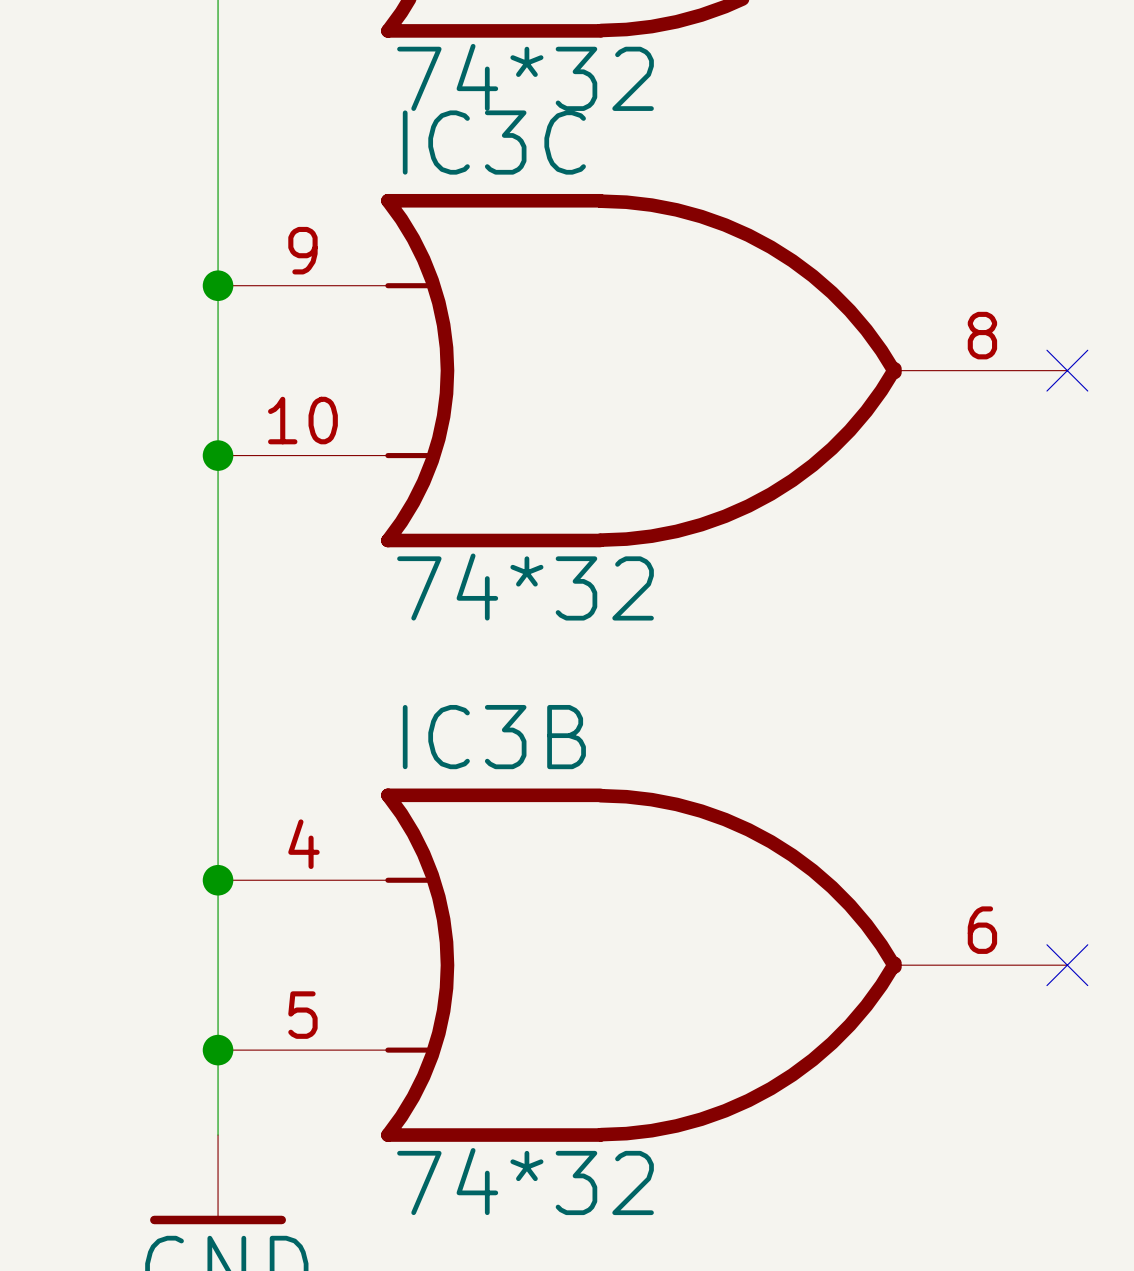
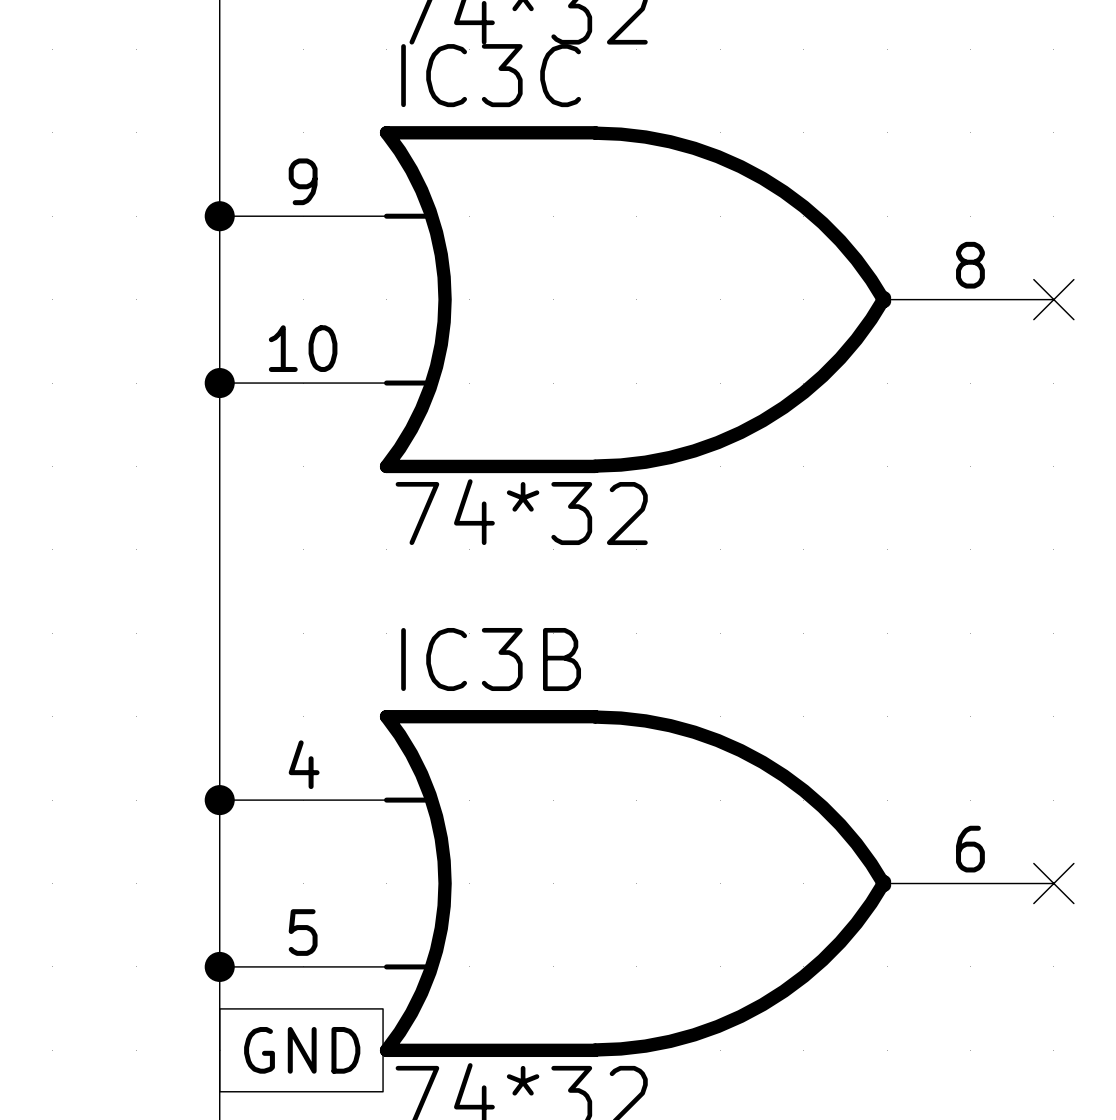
global label: none -> GND (302, 1050)

